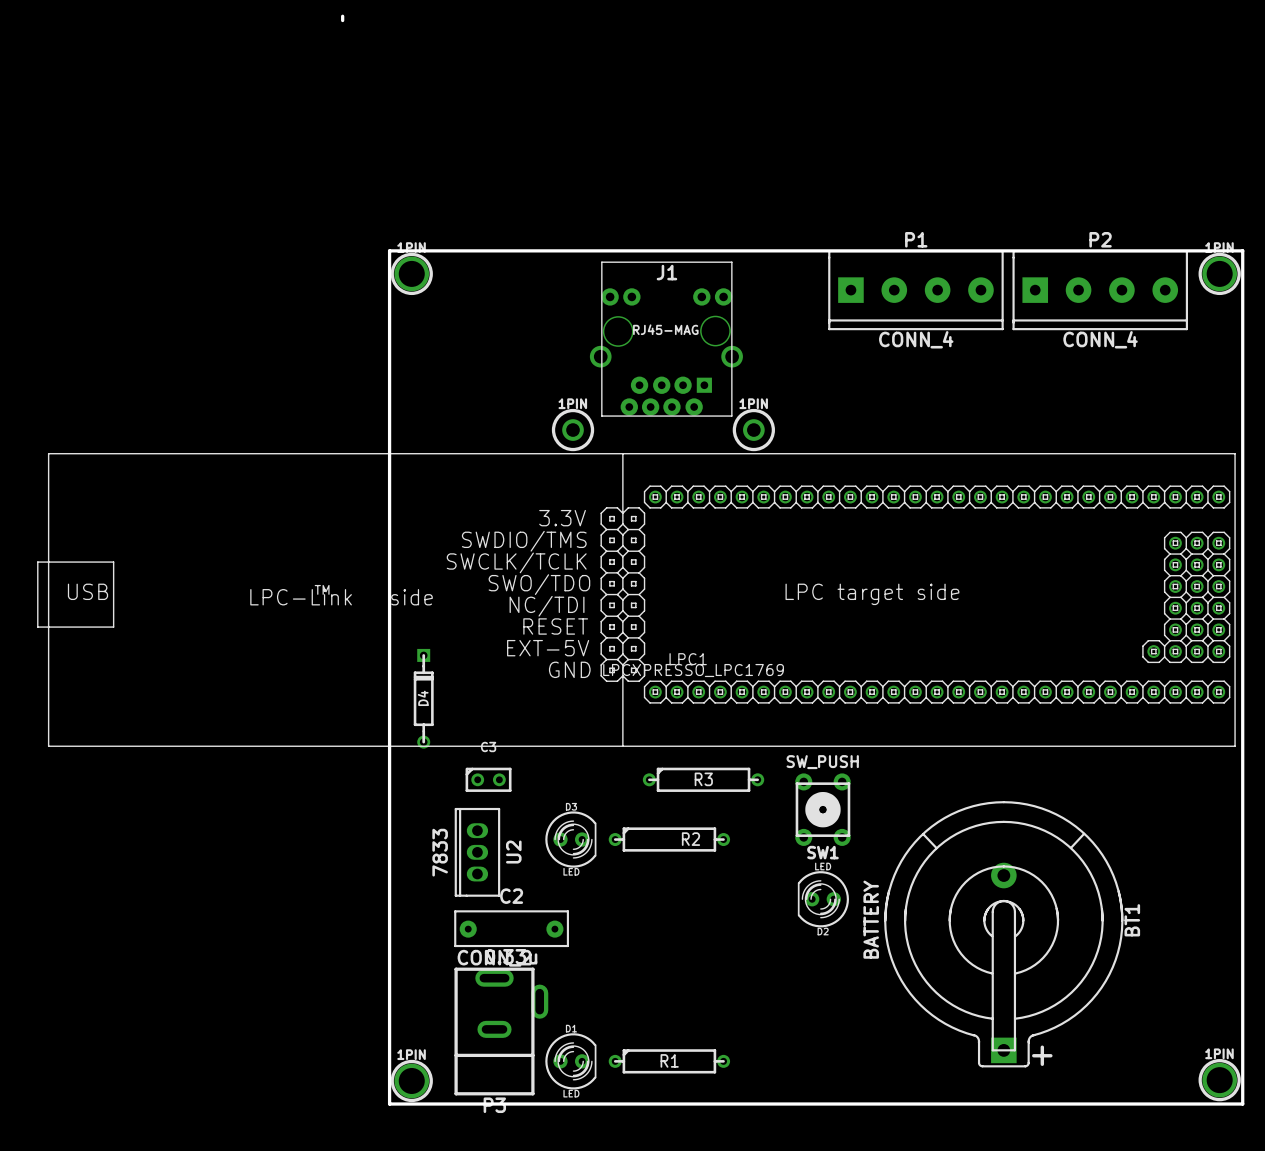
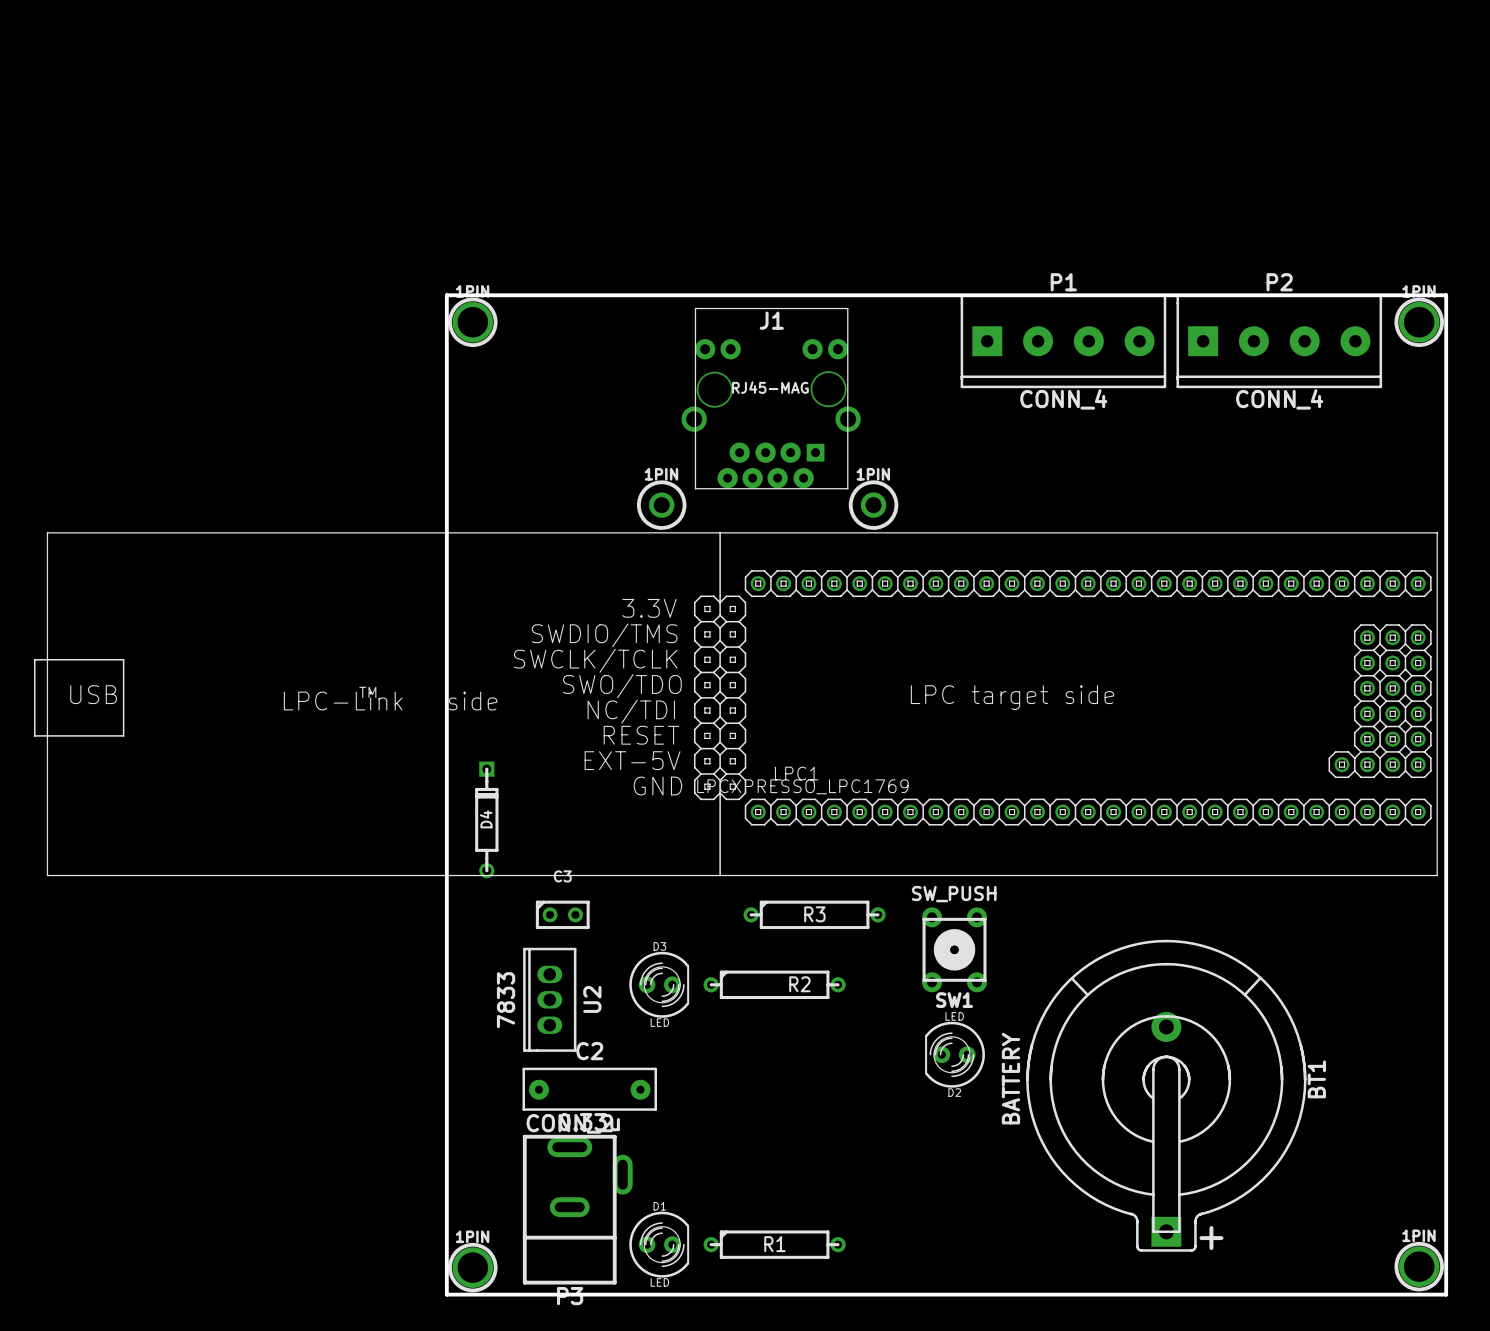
board edge: (342, 16) (342, 20) -> none

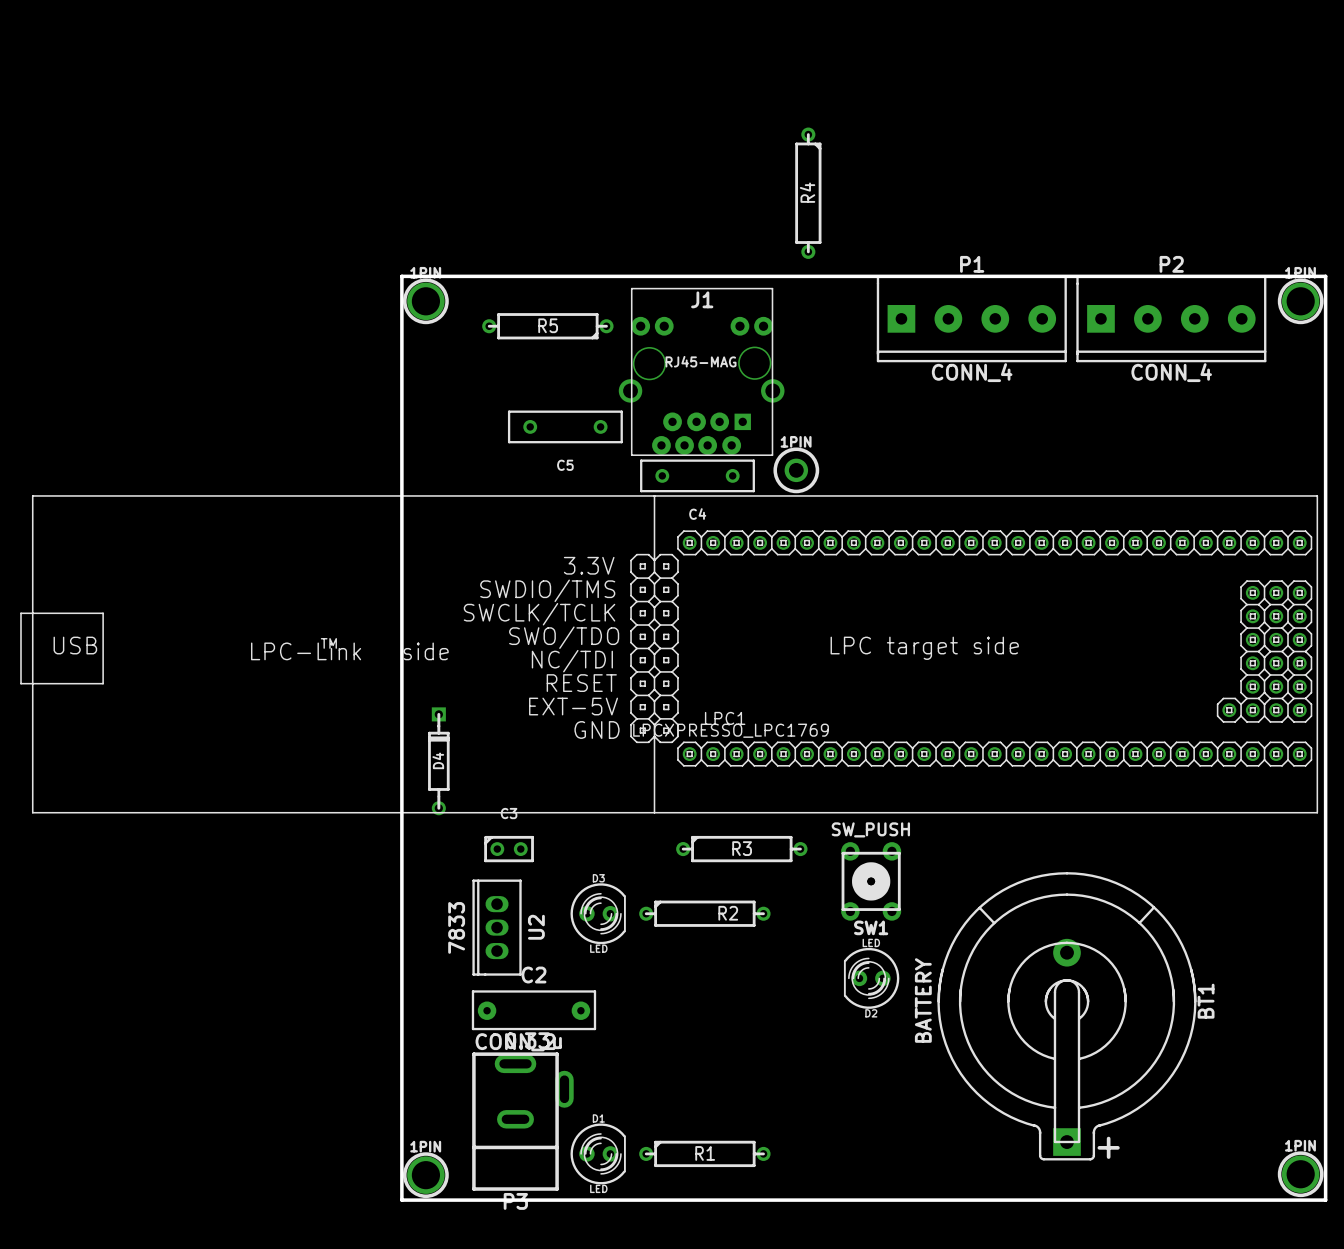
R4: none -> (808, 193)
R5: none -> (547, 326)
C5: none -> (565, 426)
1PIN: (661, 505) -> none
C4: none -> (697, 475)

